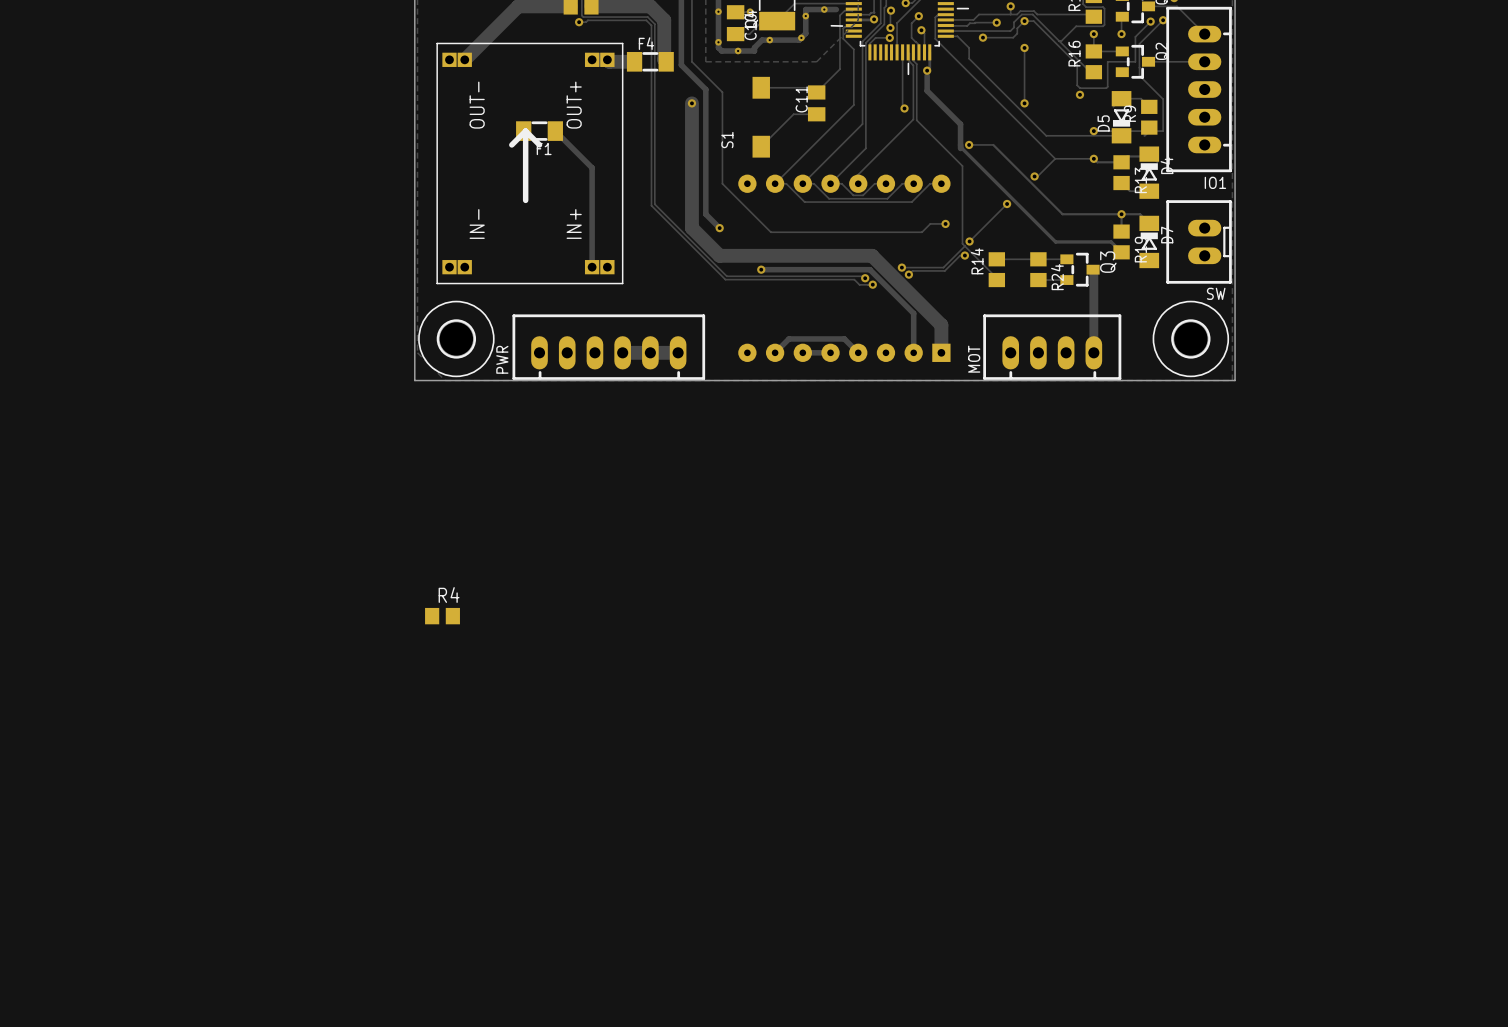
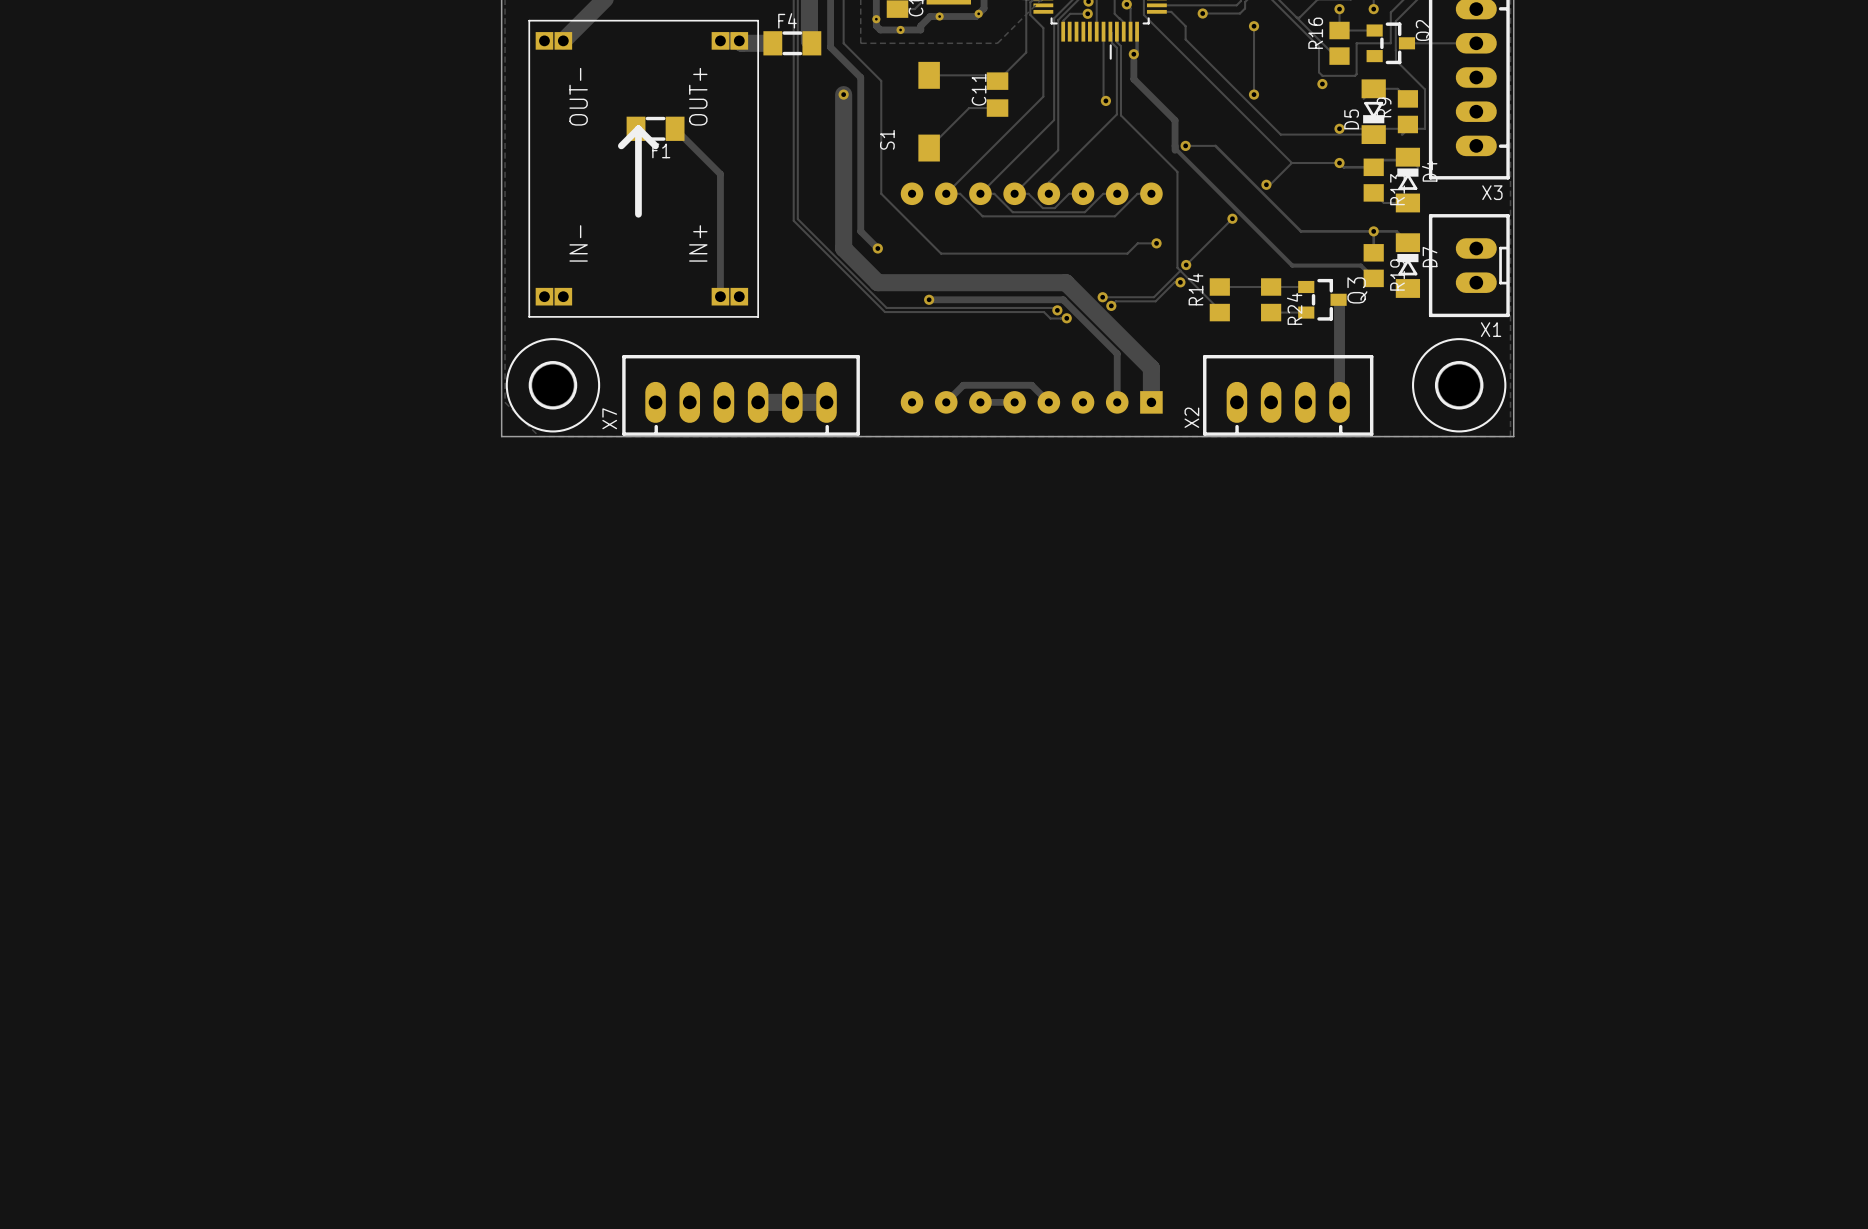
IO1 name: IO1 (1215, 182) -> X3 (1492, 192)
SW name: SW (1216, 293) -> X1 (1491, 329)
PWR name: PWR (502, 359) -> X7 (609, 418)
MOT name: MOT (974, 359) -> X2 (1191, 417)
R4: (442, 616) -> none

